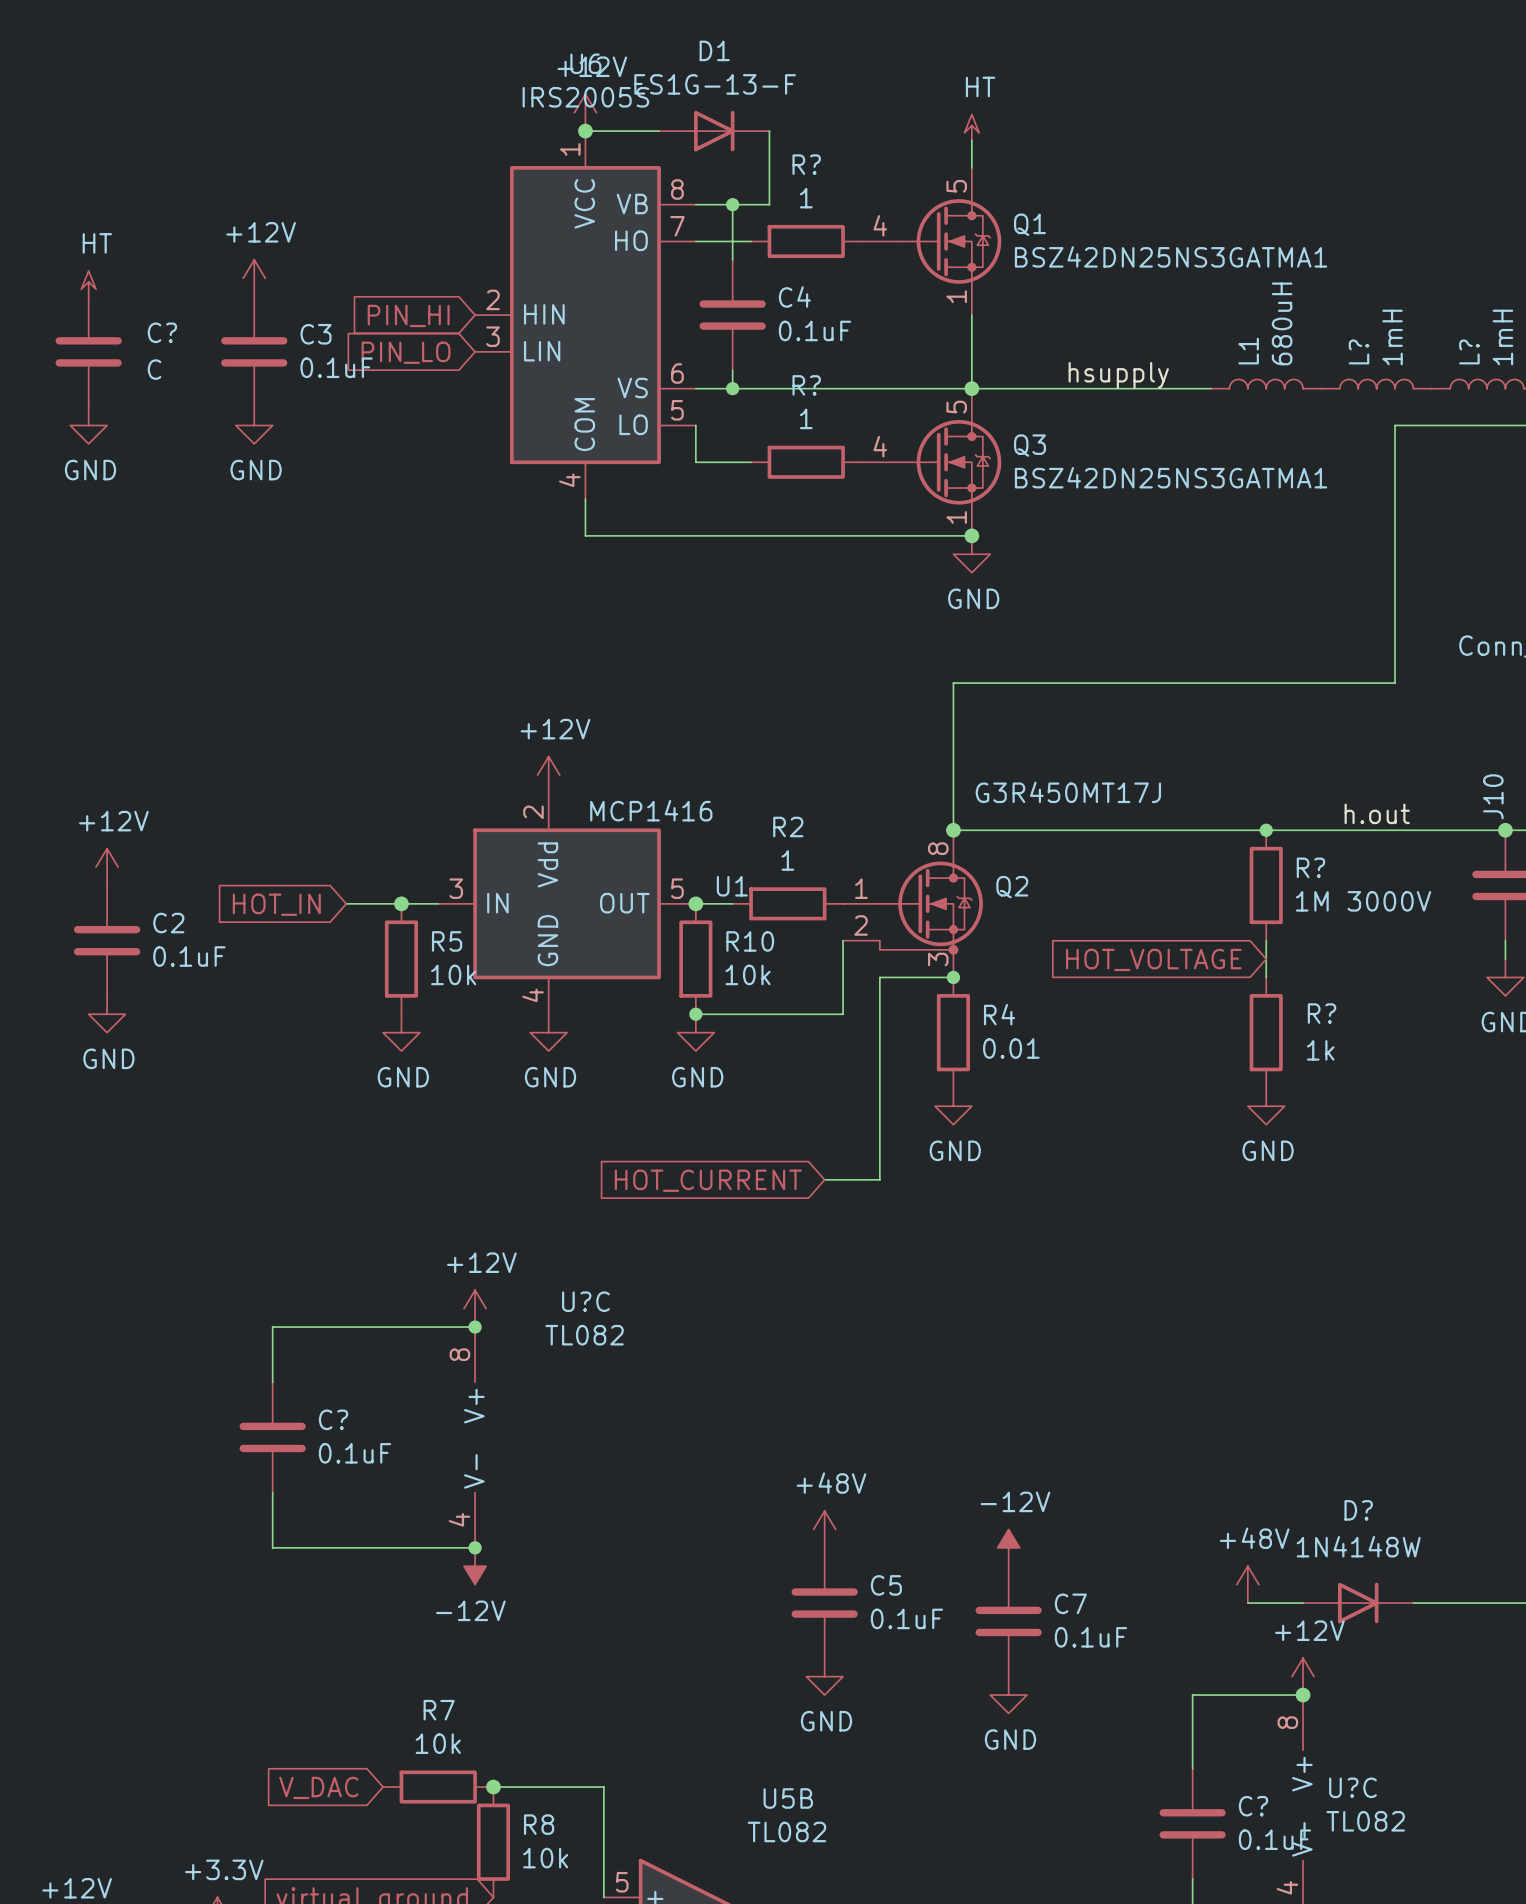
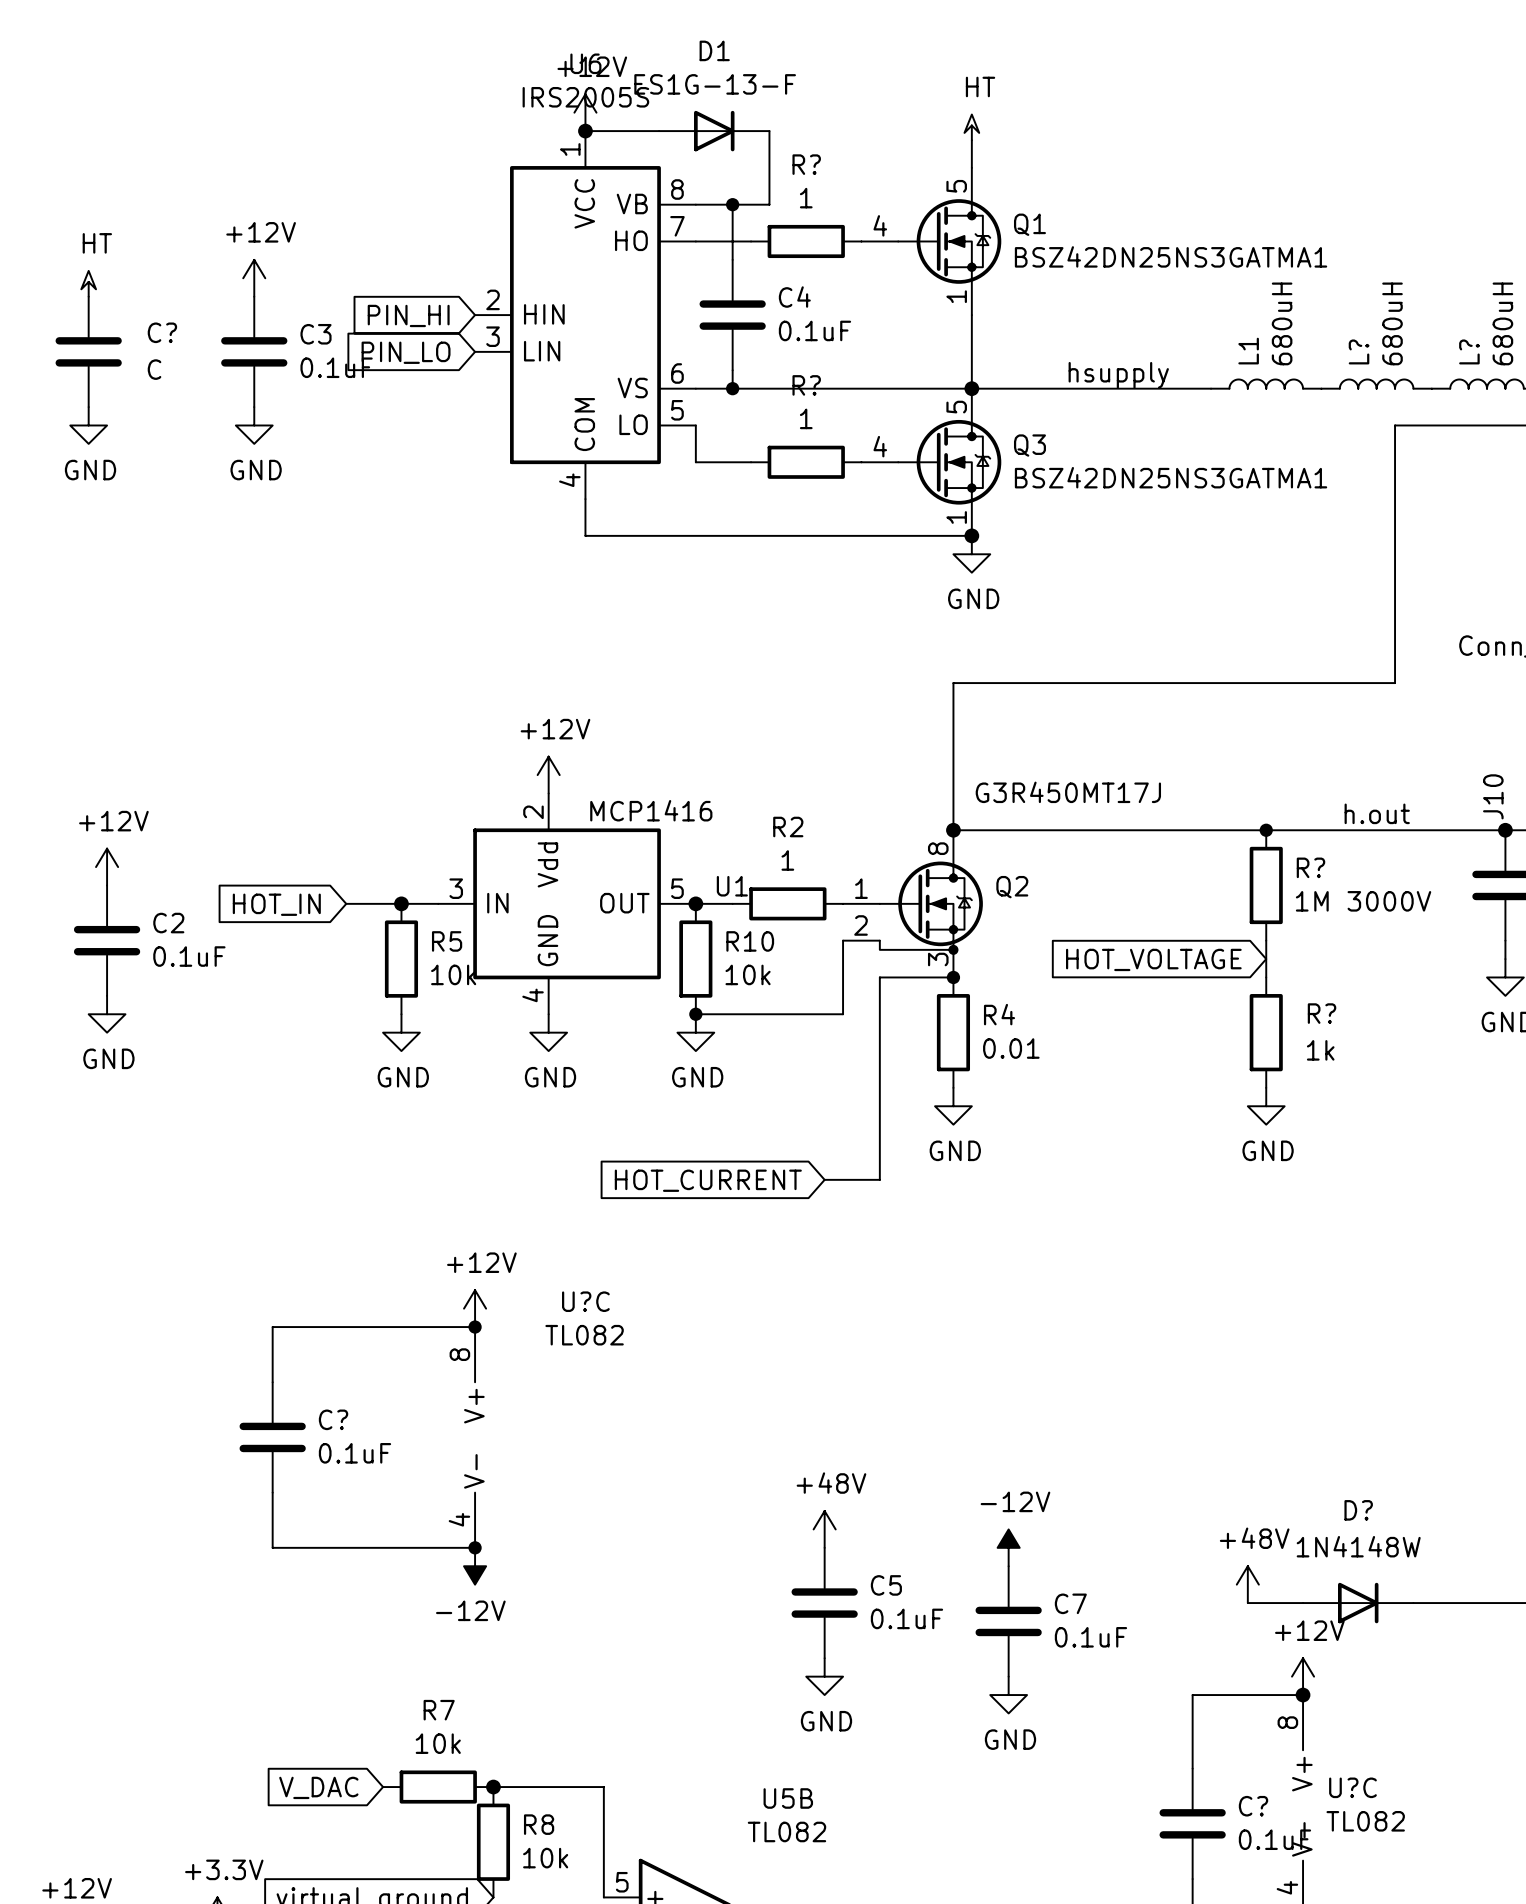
L? value: 1mH (1392, 337) -> 680uH (1392, 323)
L? value: 1mH (1502, 337) -> 680uH (1502, 323)

